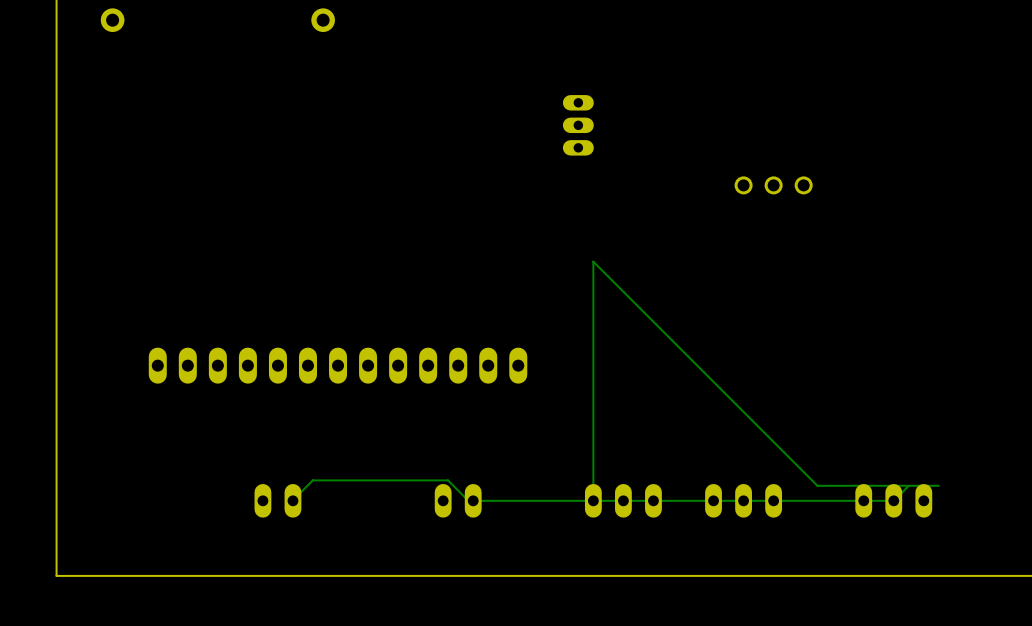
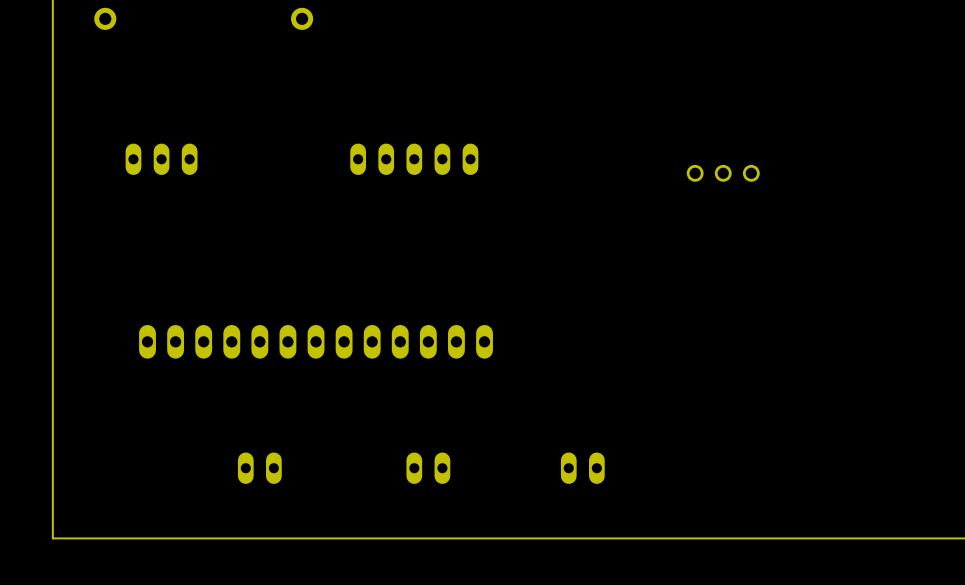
part: (578, 125) -> none
part: none -> (161, 159)
part: none -> (414, 159)
part footprint: [584, 484, 662, 518] -> [560, 452, 605, 484]
track: (908, 485) (893, 500) (473, 500) (467, 500) (447, 480) (312, 480) (292, 500) -> none
track: (938, 485) (817, 485) (593, 261) (593, 500) -> none
part: (743, 500) -> none
part: (893, 500) -> none

